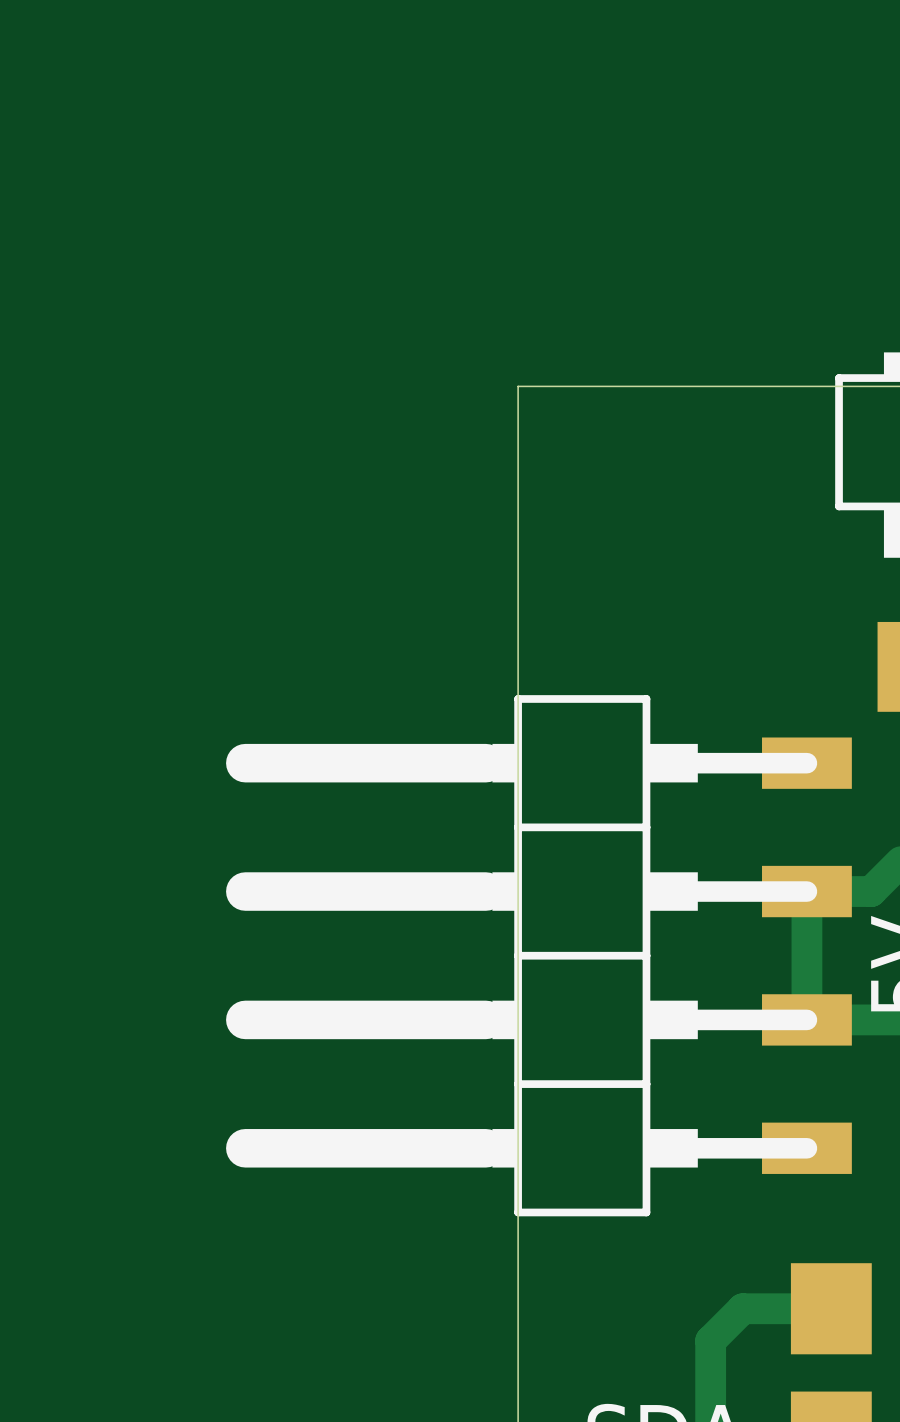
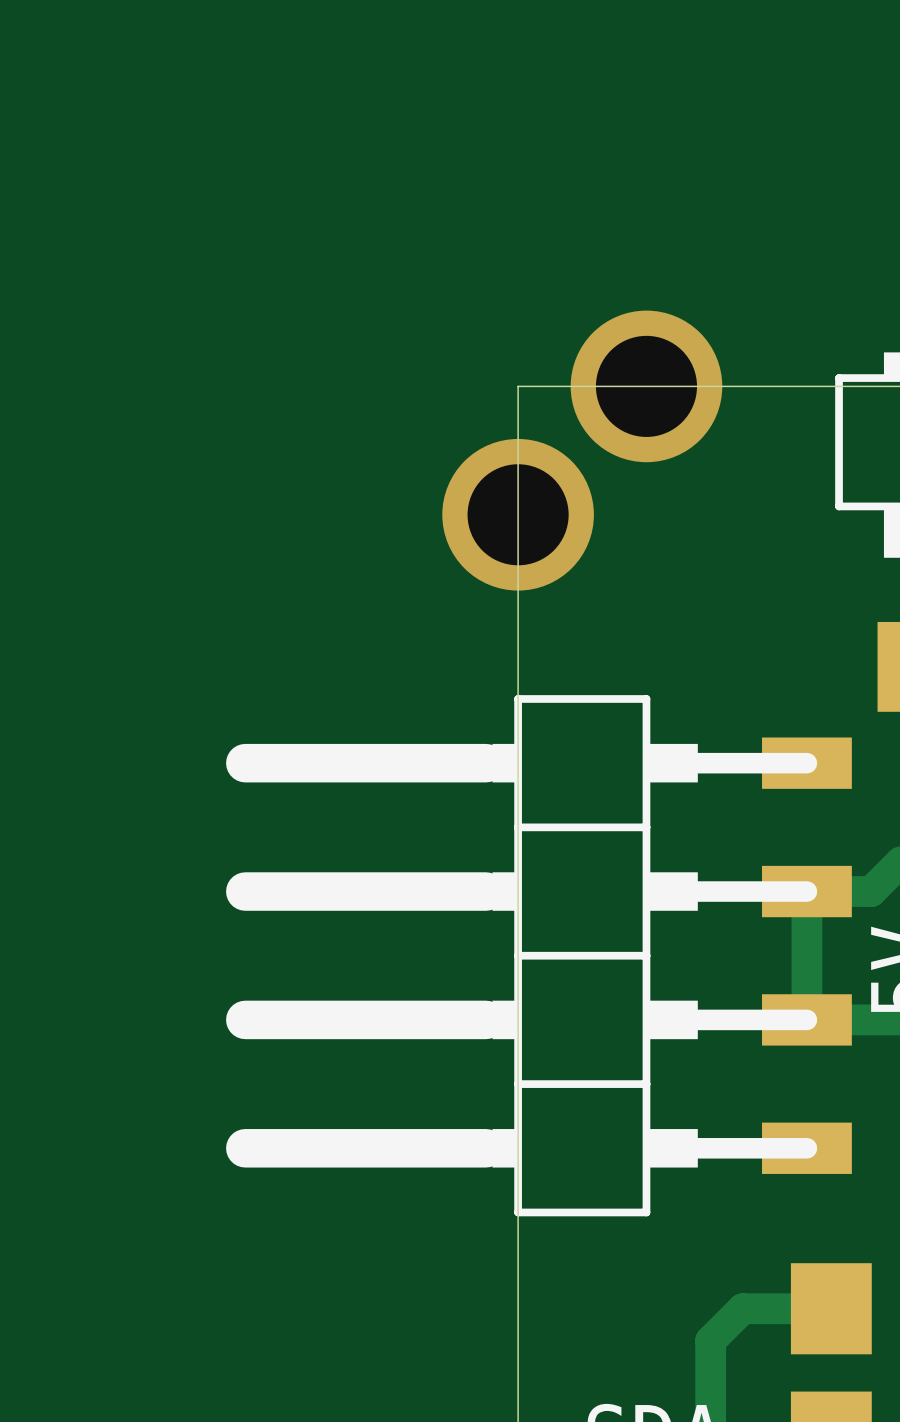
via: none -> (646, 386)
via: none -> (518, 514)

